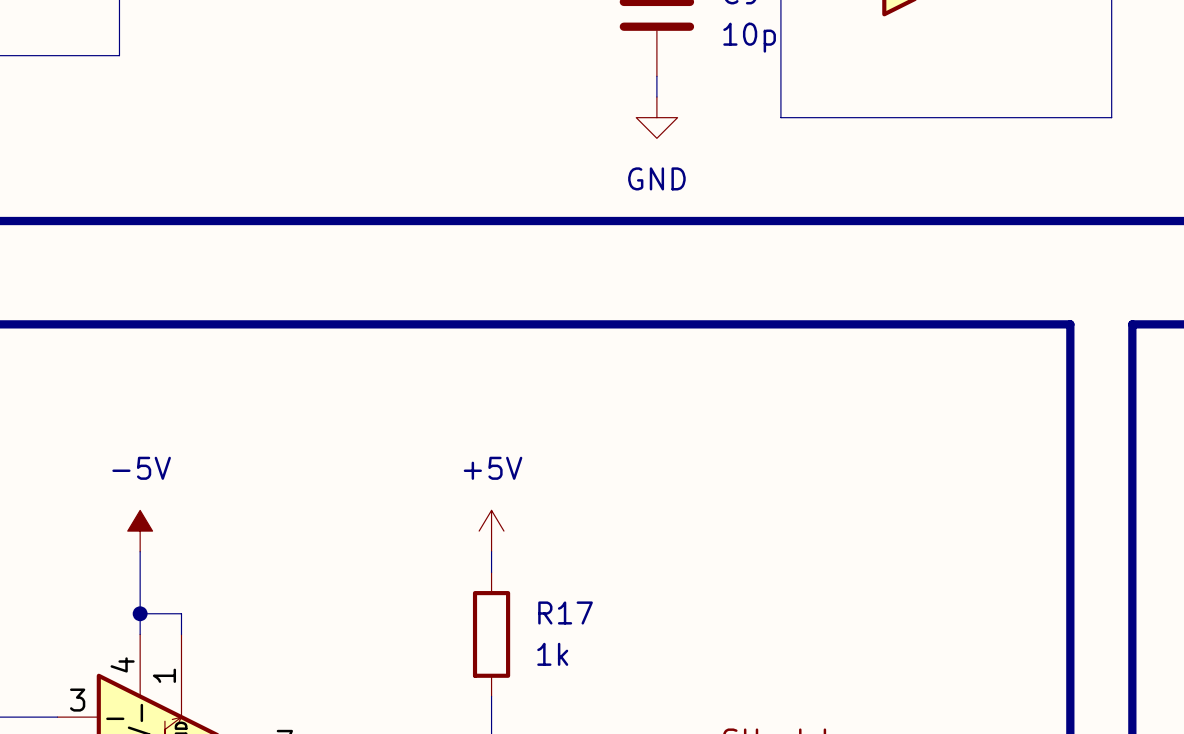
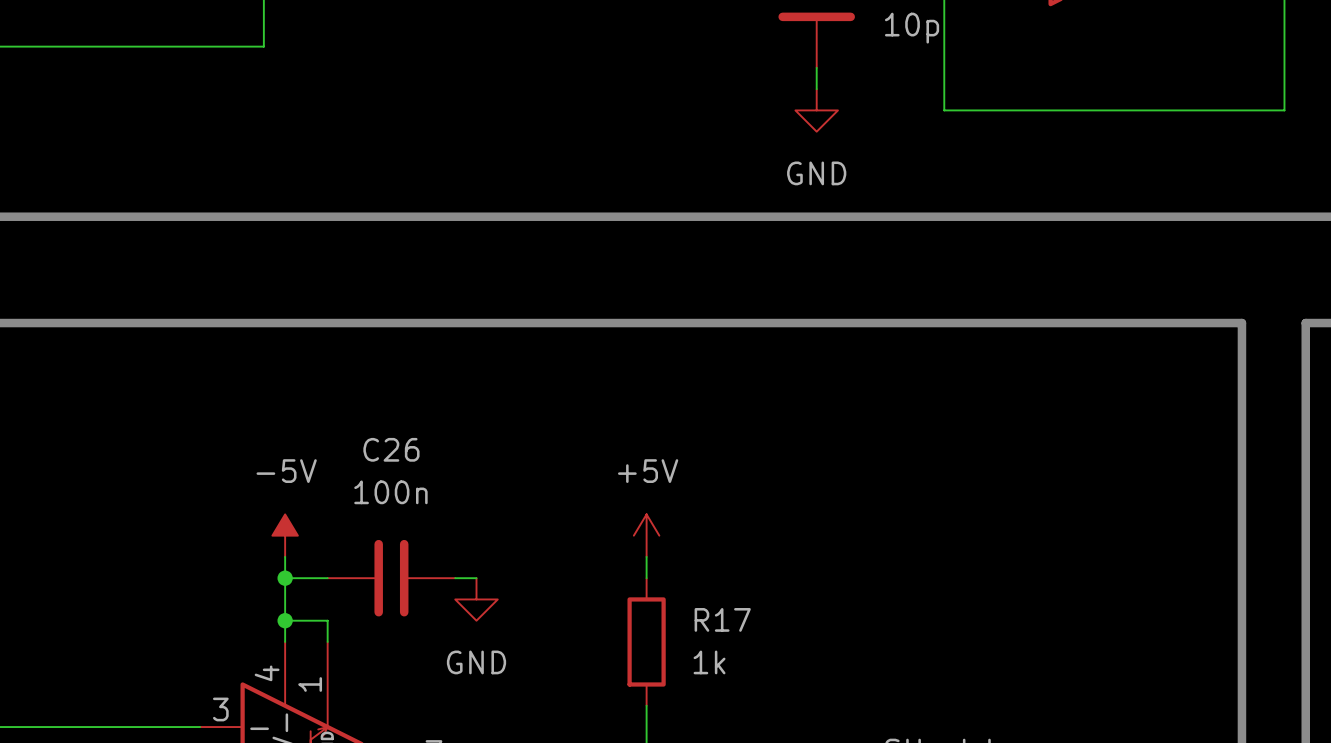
wire: none -> (285, 578) (327, 578)
junction: none -> (285, 578)
C26: none -> 100n (391, 578)
wire: none -> (455, 578) (476, 578)
power symbol: none -> GND (476, 599)

